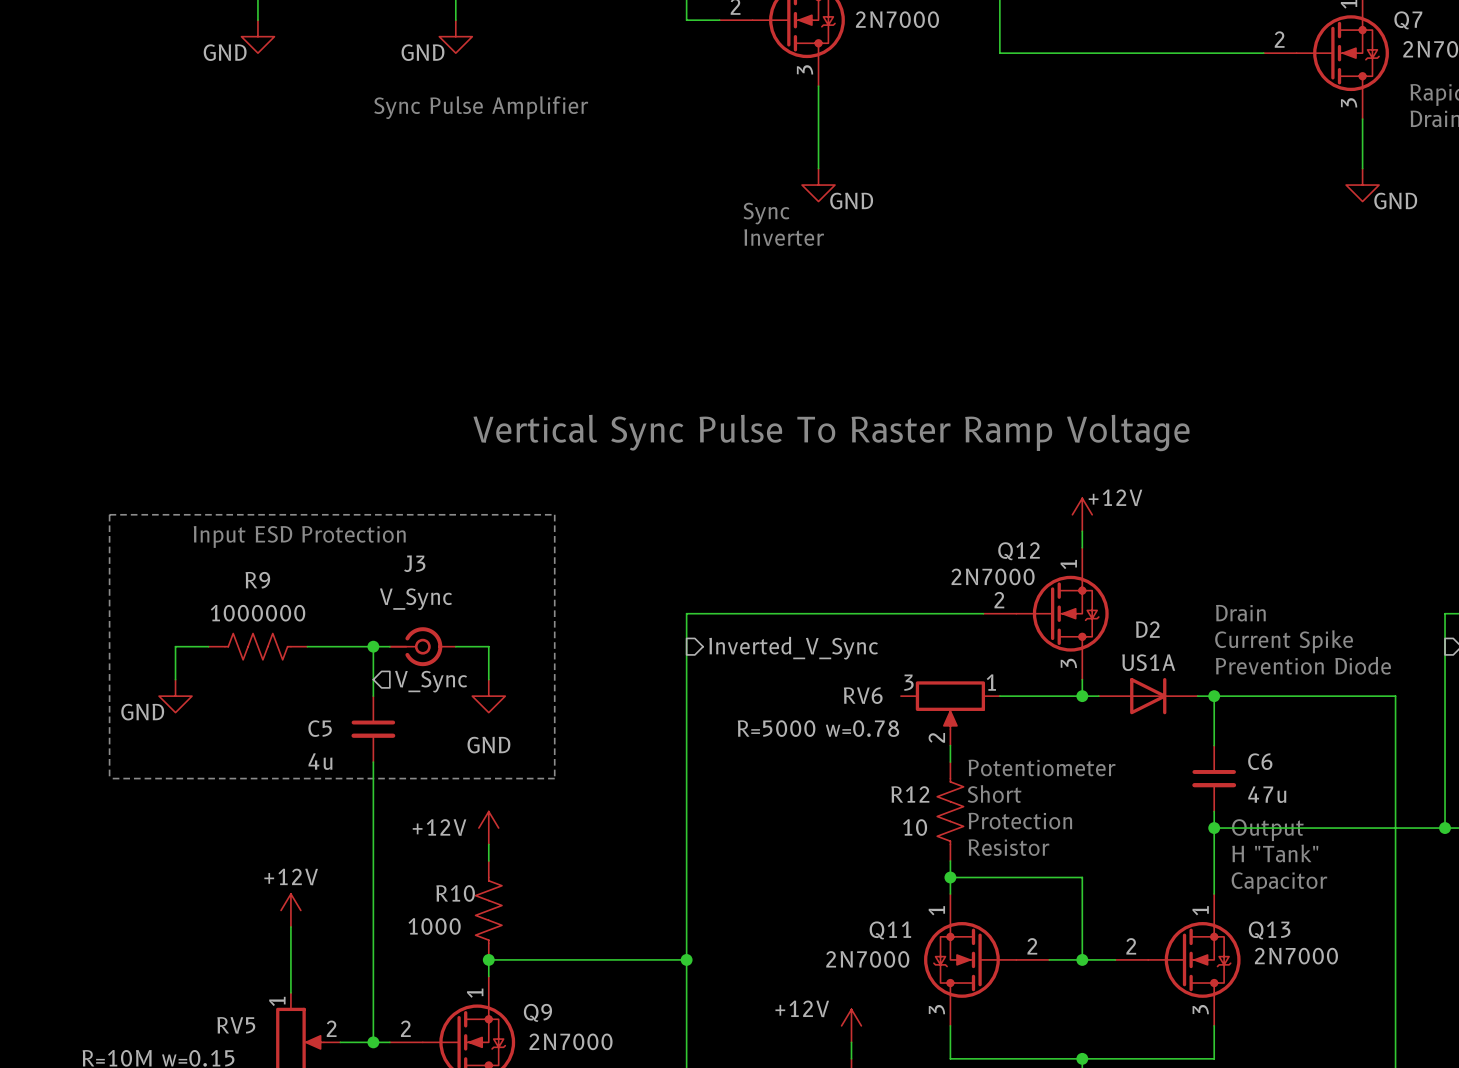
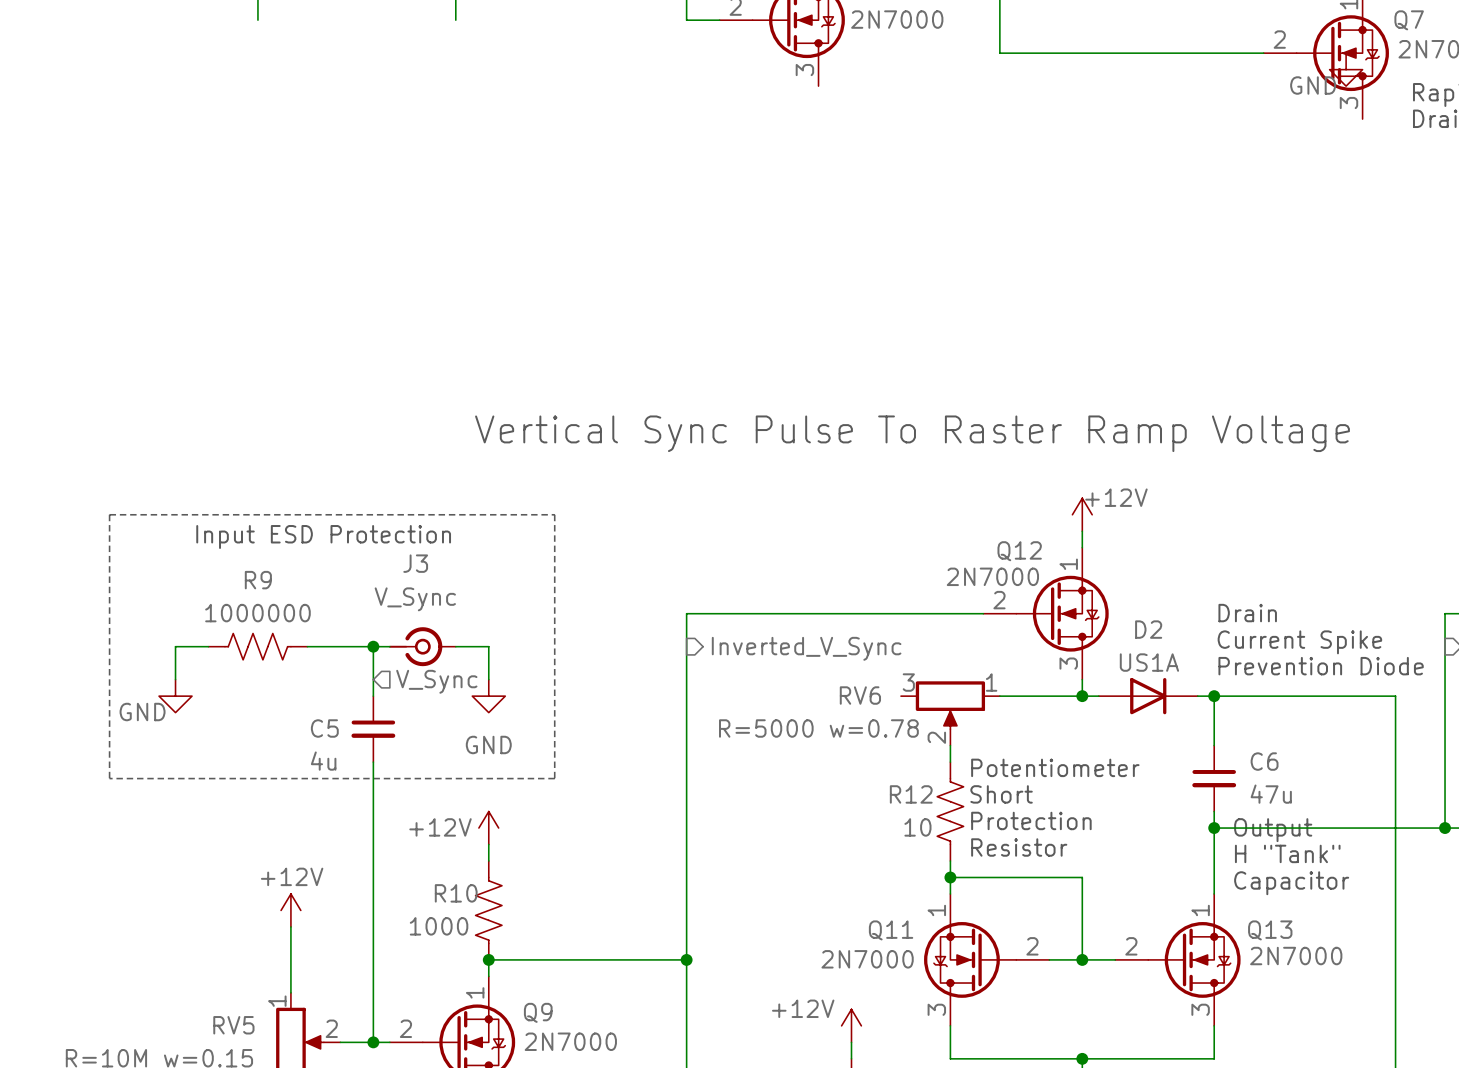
power symbol: GND (257, 36) -> none
power symbol: GND (455, 36) -> none
power symbol: none -> GND (1346, 69)
wire: (818, 86) (818, 168) -> none
text: Sync Pulse Amplifier (481, 107) -> none
wire: (1362, 119) (1362, 168) -> none
power symbol: GND (818, 185) -> none
power symbol: GND (1362, 185) -> none
text: Sync (766, 213) -> none
text: Inverter (784, 237) -> none

